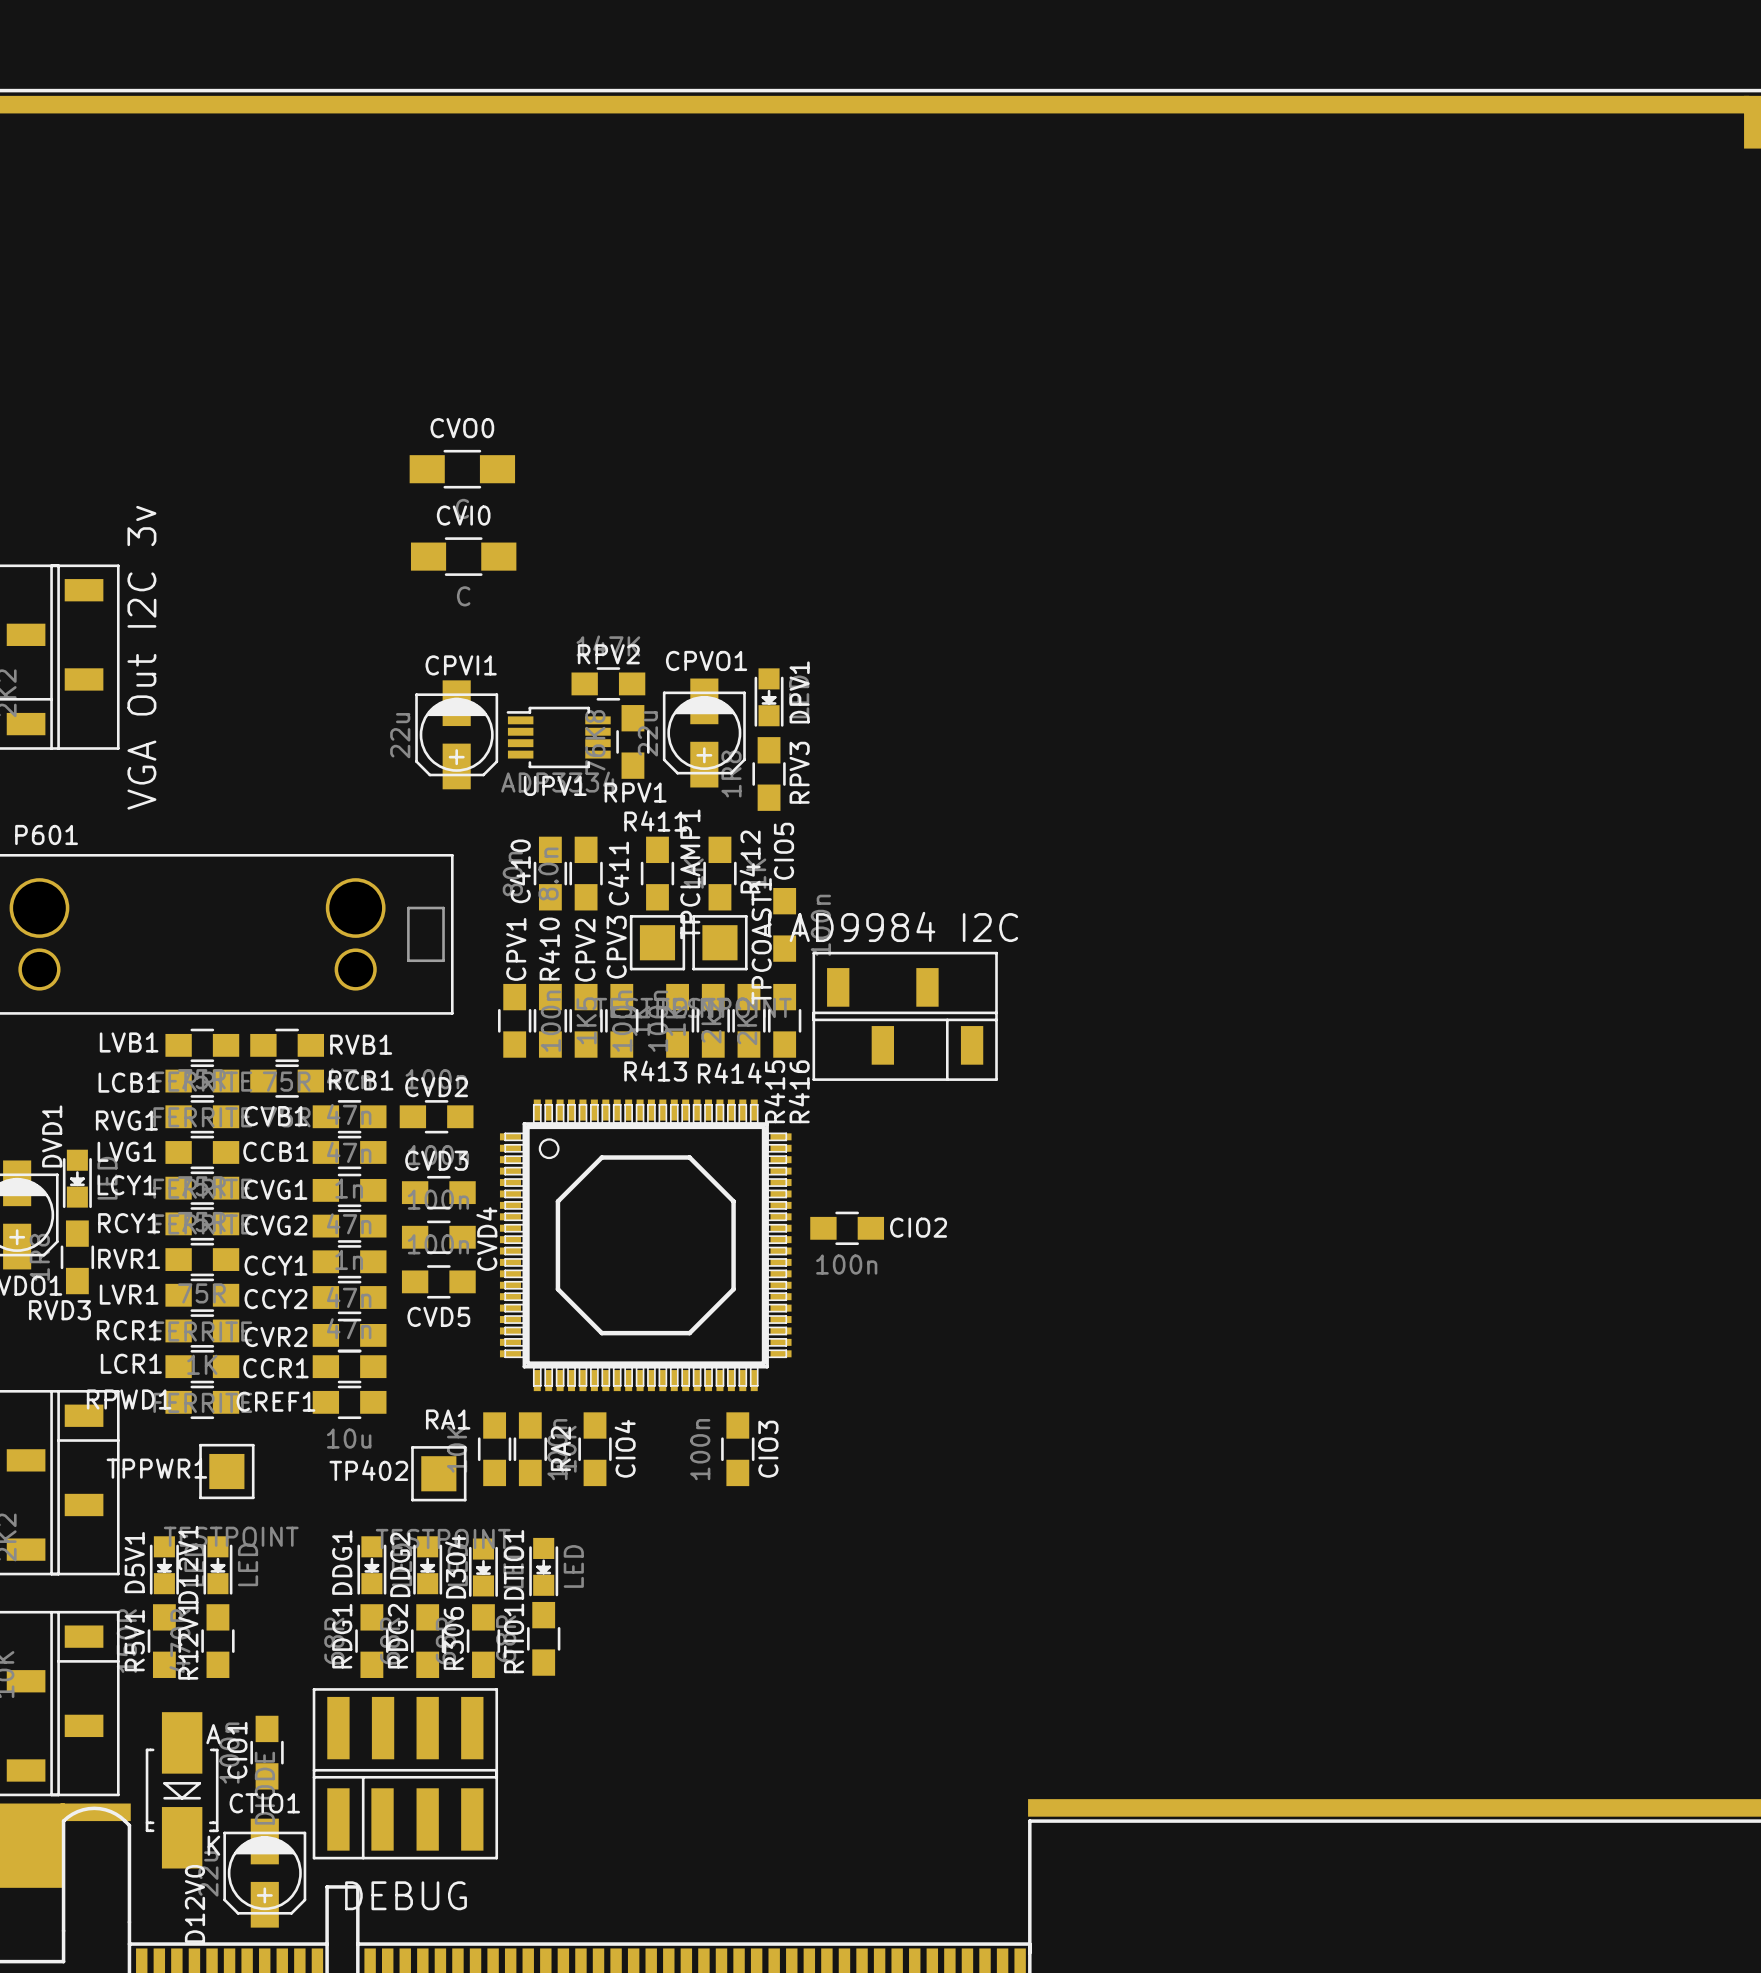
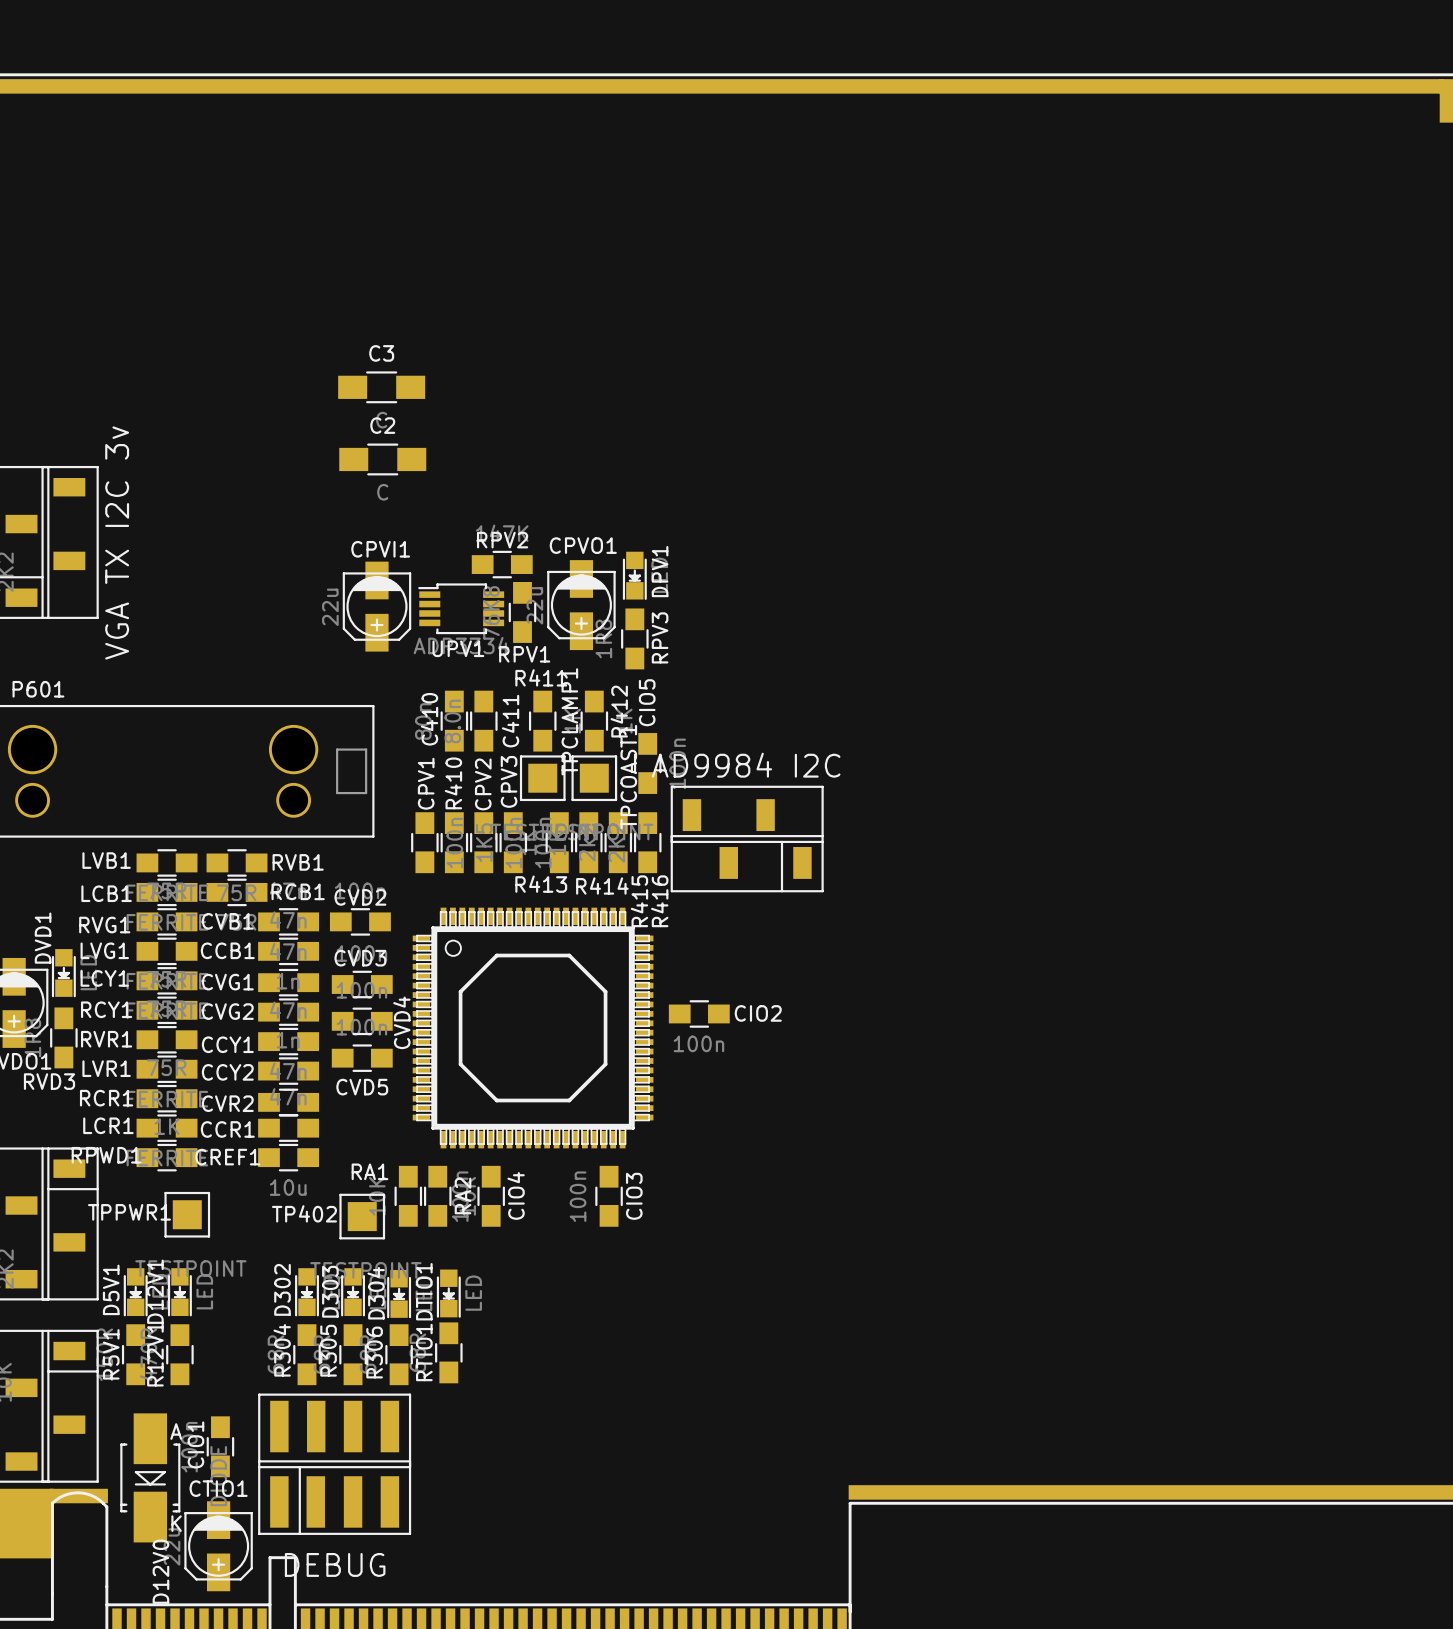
CVO0 name: CVO0 (462, 428) -> C3 (381, 353)
CVI0 name: CVI0 (463, 515) -> C2 (382, 425)
part value: VGA Out I2C 3v (141, 657) -> VGA TX I2C 3v (117, 542)
DDG1 name: DDG1 (342, 1562) -> D302 (282, 1289)
DDG2 name: DDG2 (400, 1564) -> D303 (330, 1291)
RDG1 name: RDG1 (342, 1636) -> R304 (282, 1350)
RDG2 name: RDG2 (398, 1636) -> R305 (328, 1350)

